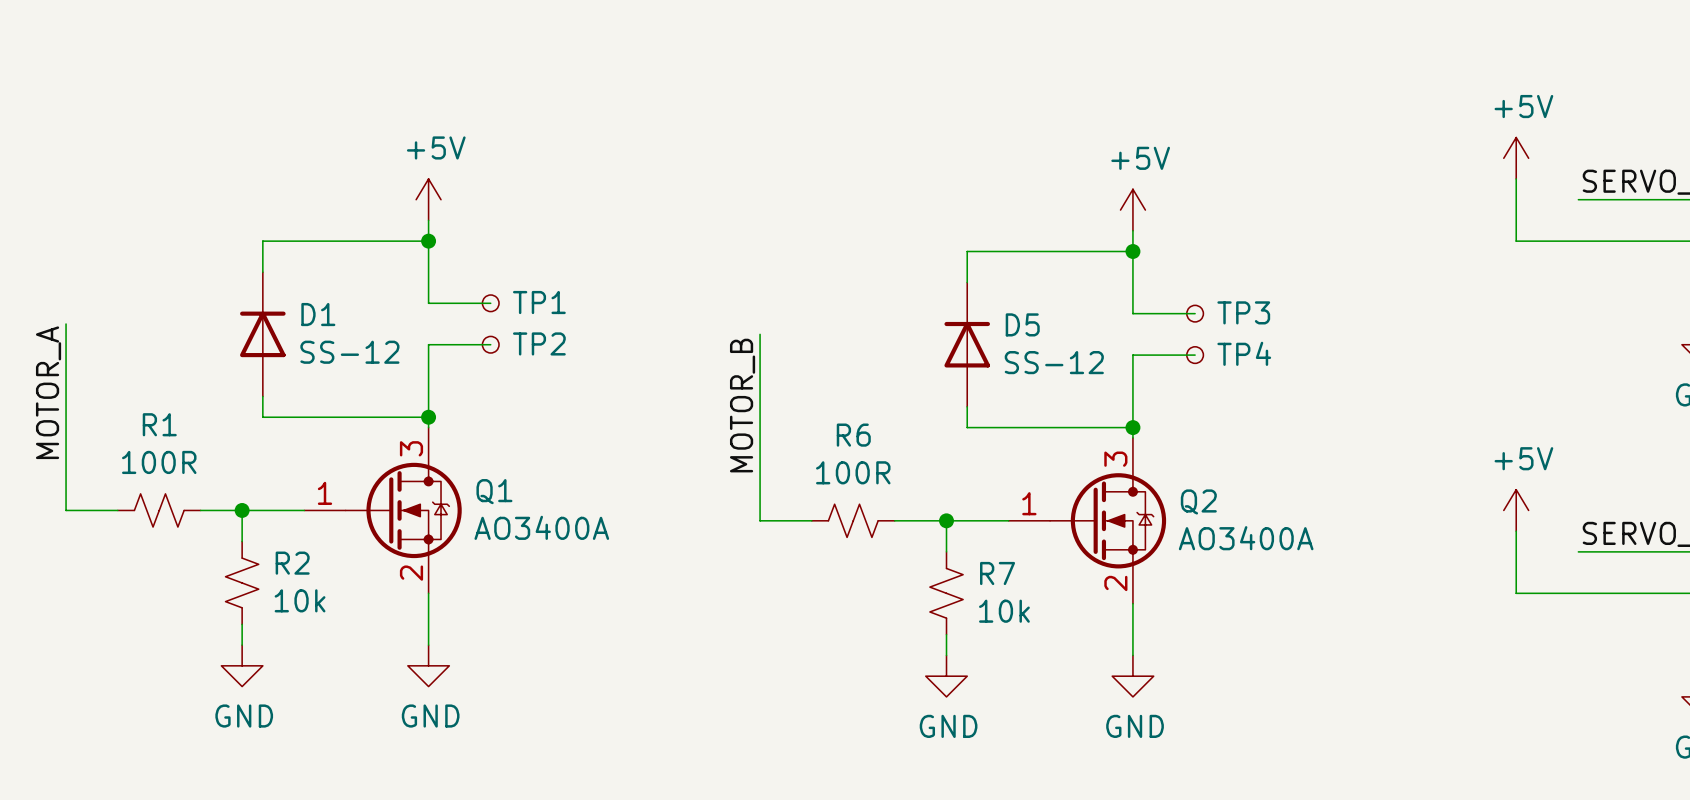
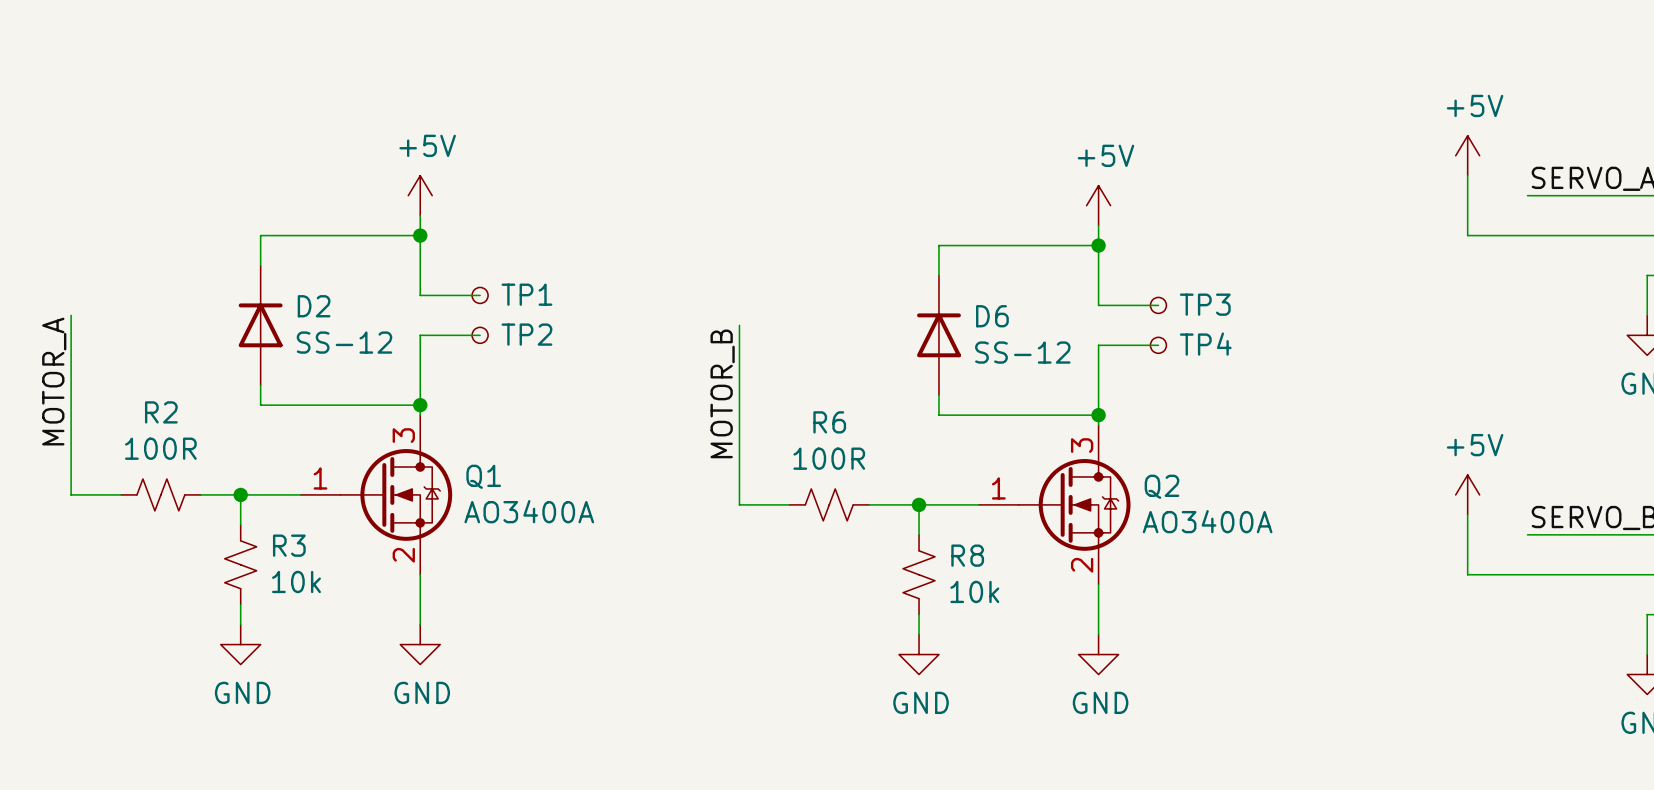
D1 name: D1 (318, 314) -> D2 (314, 306)
D5 name: D5 (1022, 324) -> D6 (992, 316)
R1 name: R1 (159, 424) -> R2 (161, 412)
R2 name: R2 (292, 563) -> R3 (289, 545)
R7 name: R7 (997, 573) -> R8 (967, 555)

